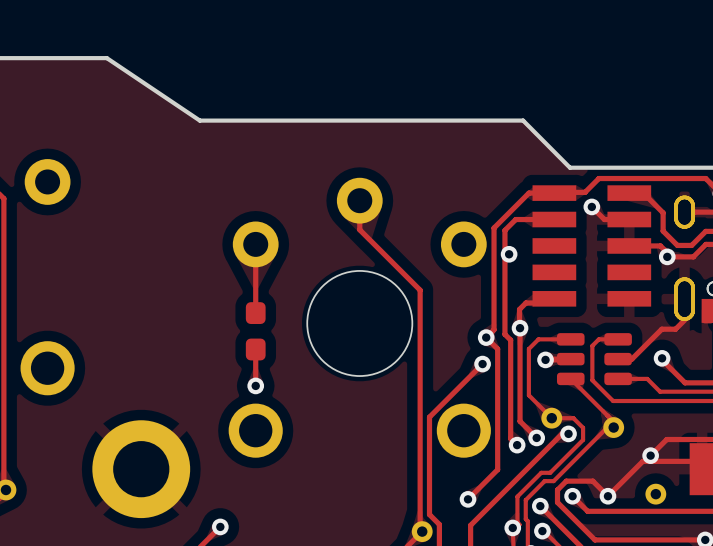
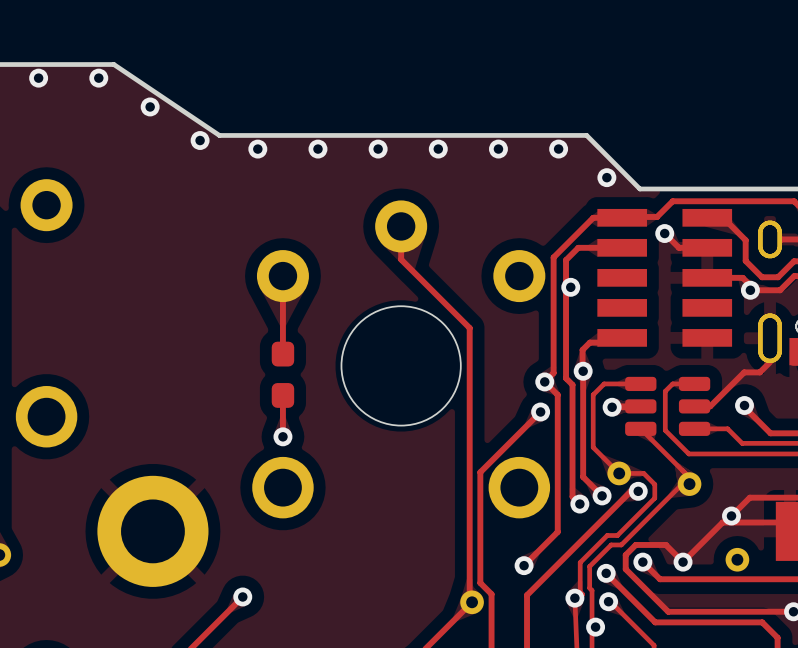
via: none -> (38, 78)
via: none -> (98, 78)
via: none -> (150, 106)
via: none -> (200, 140)
via: none -> (257, 149)
via: none -> (317, 149)
via: none -> (378, 149)
via: none -> (438, 149)
via: none -> (498, 149)
via: none -> (558, 149)
via: none -> (606, 177)

